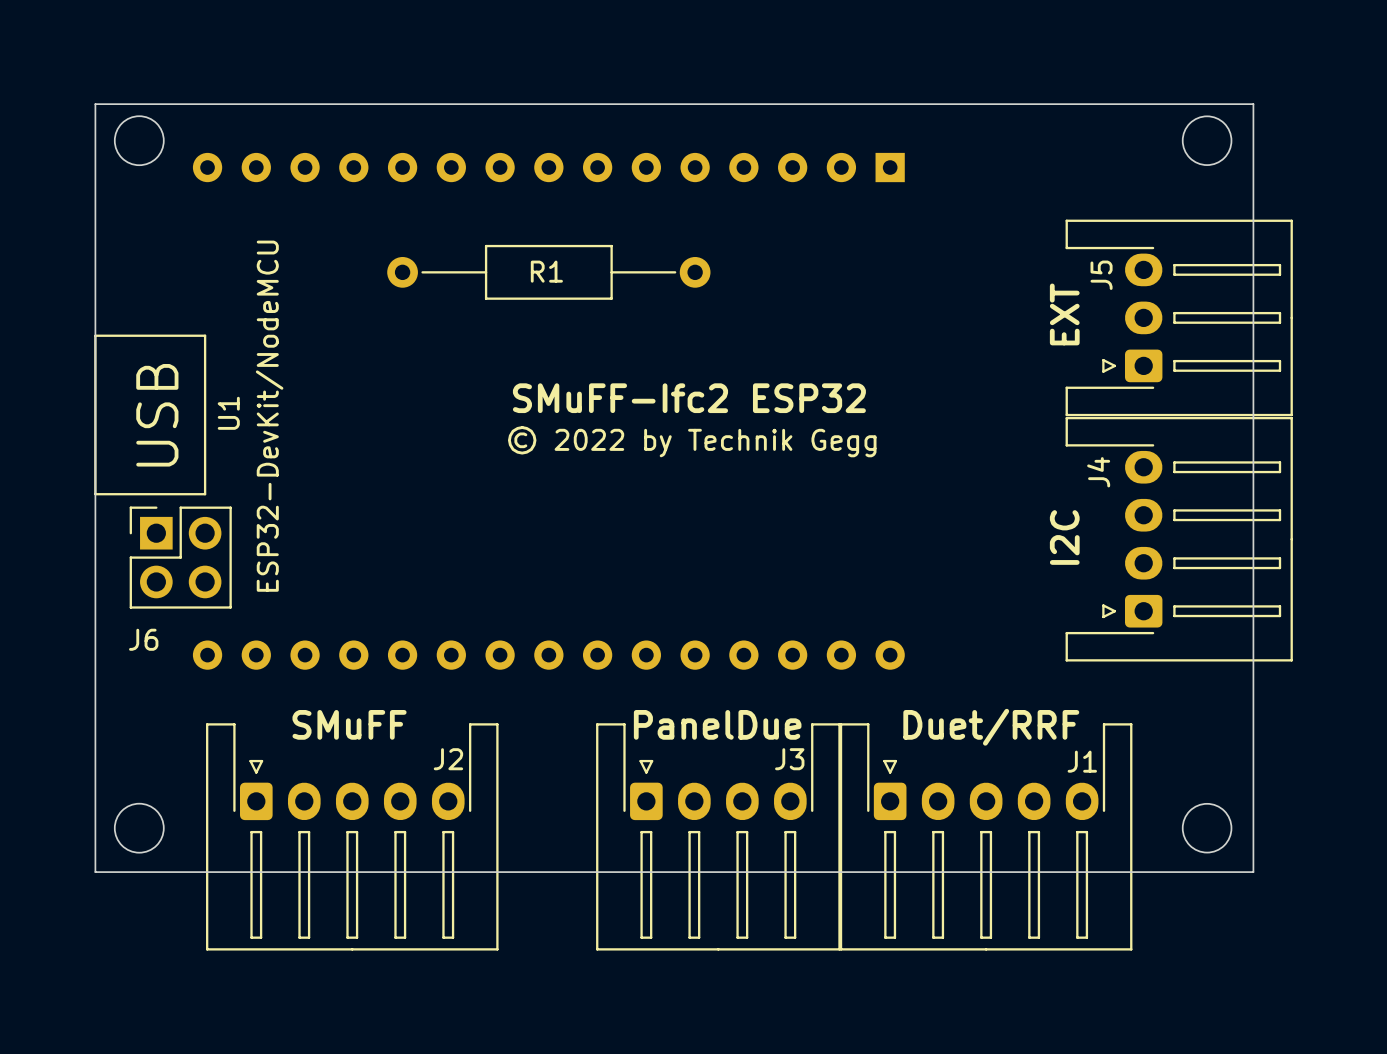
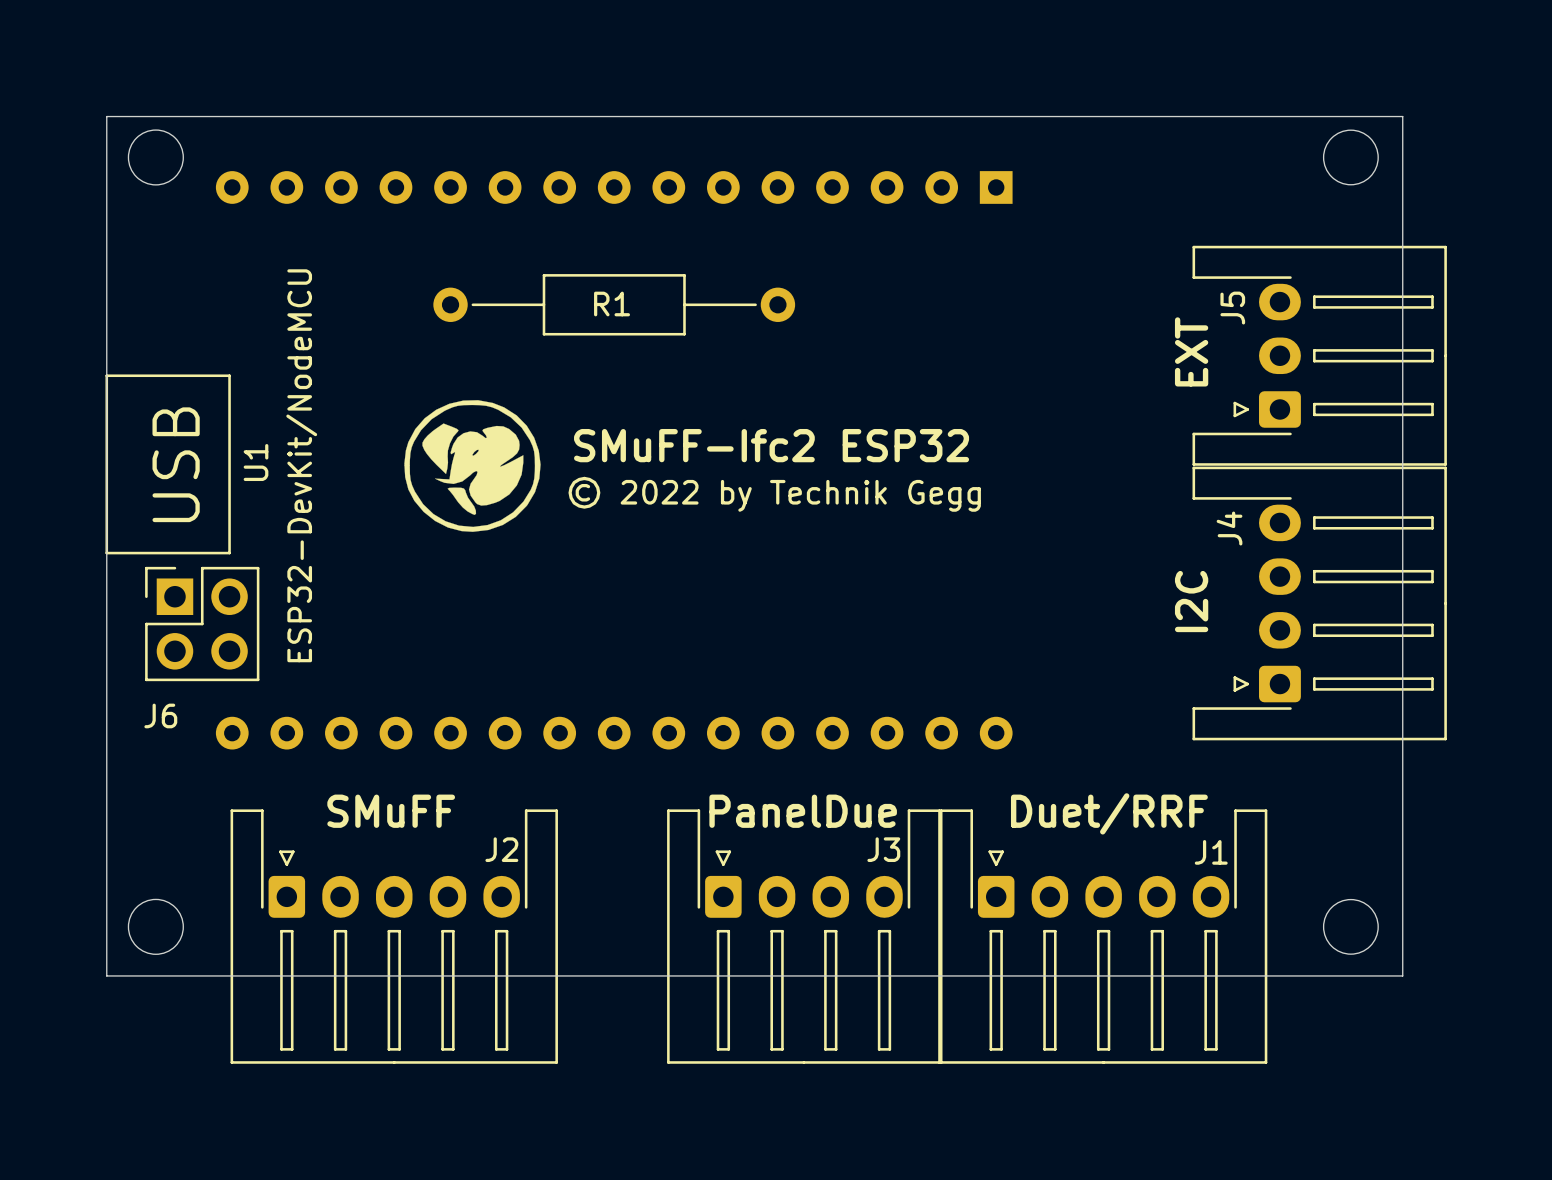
drawing: none -> [404, 400, 541, 532]

